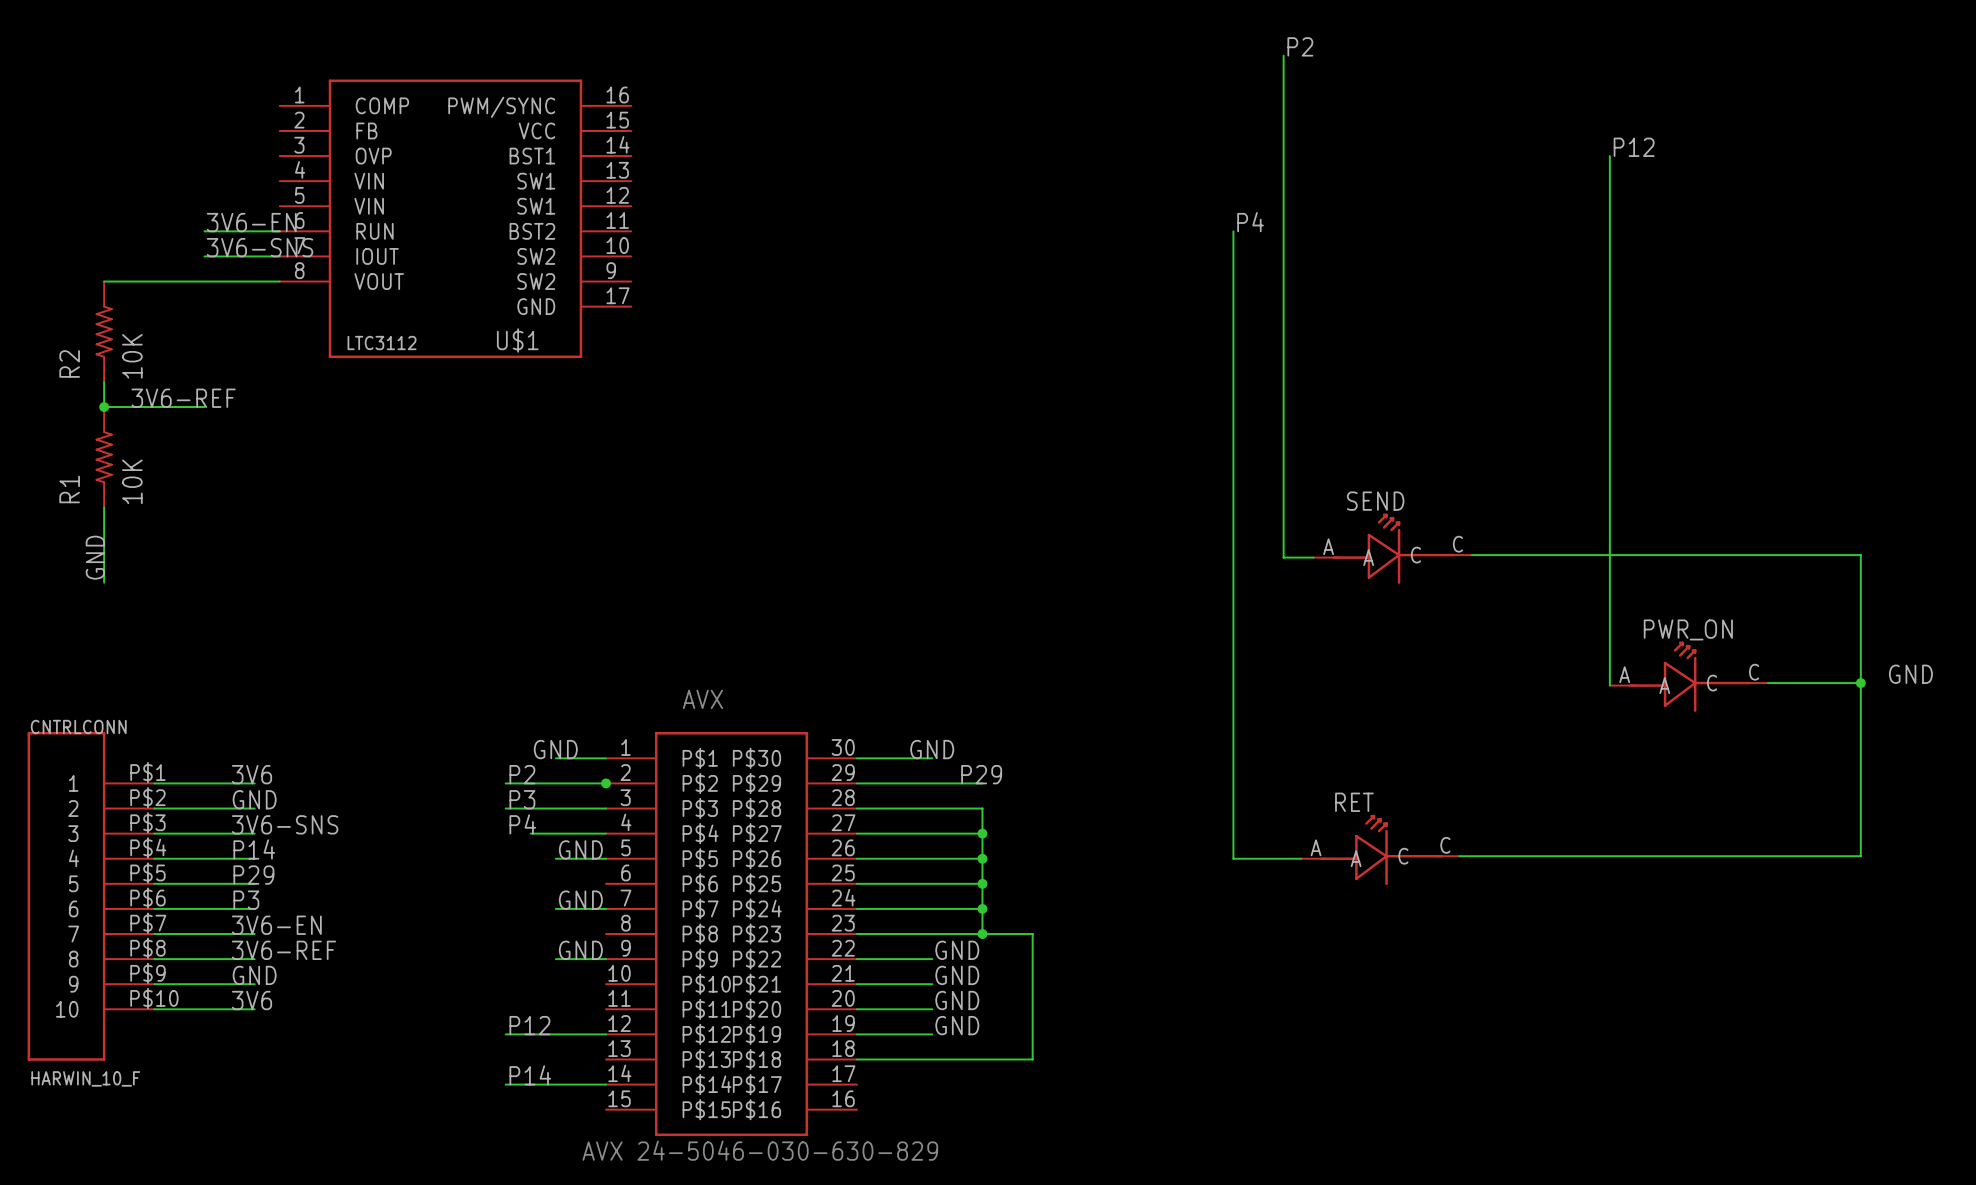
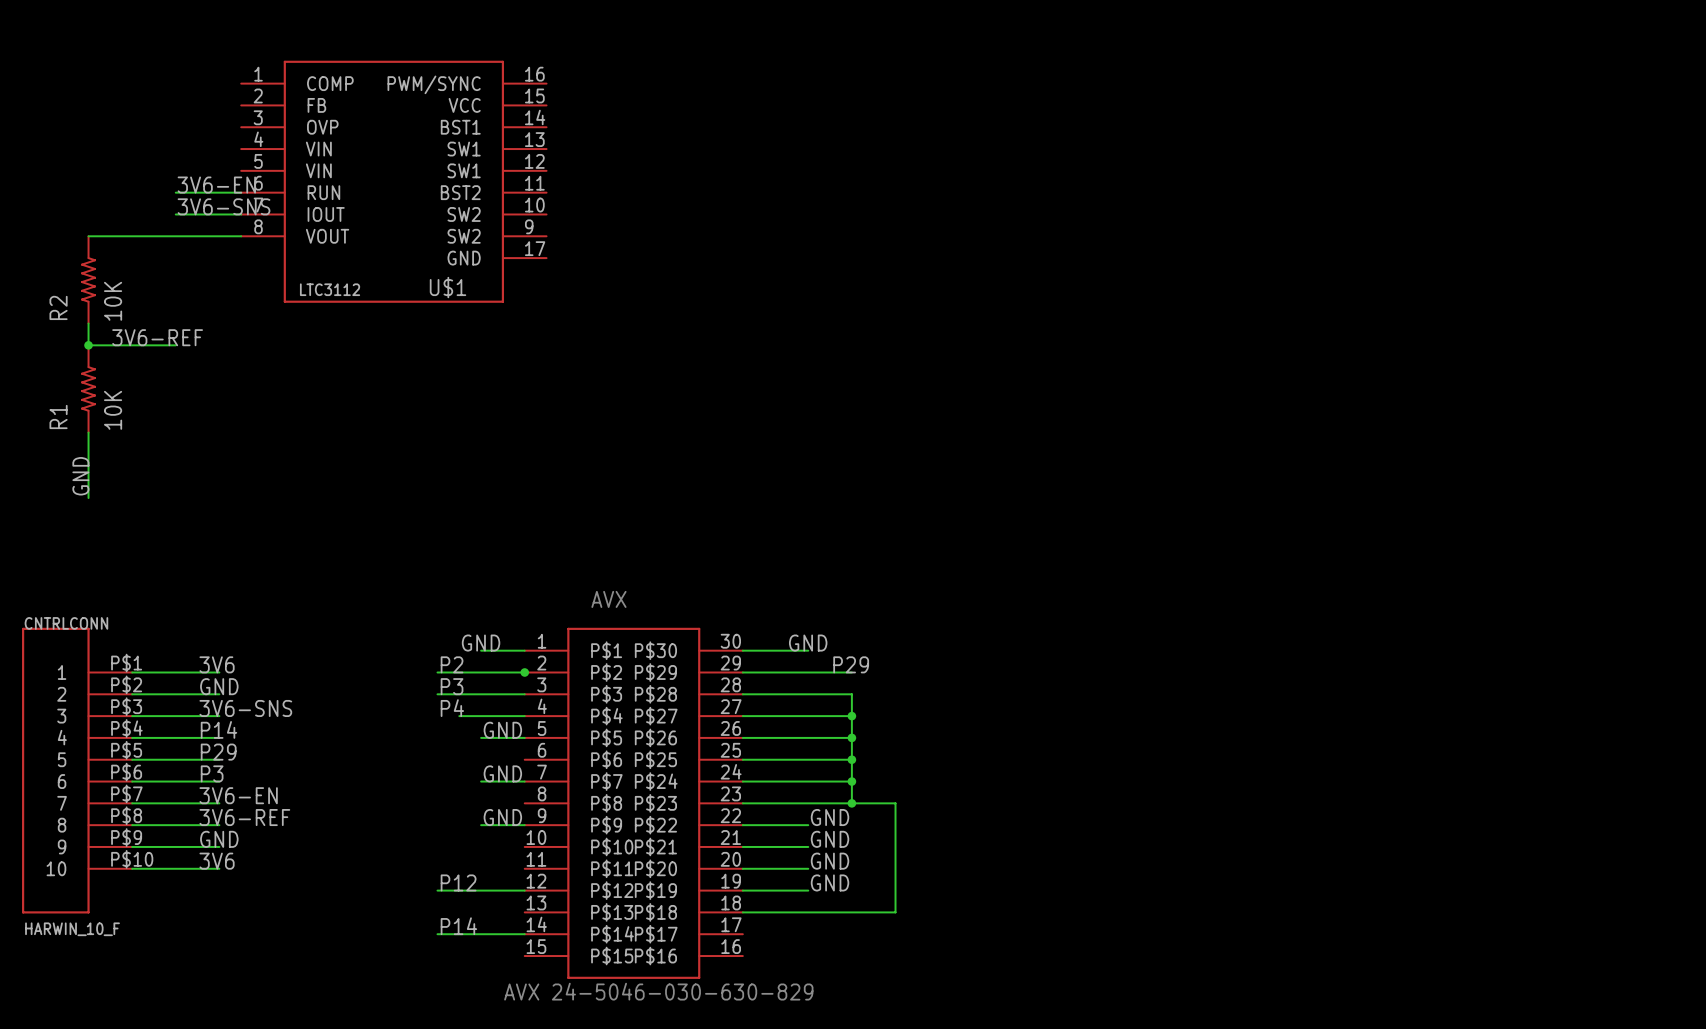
label: P2 (1300, 46) -> none
wire: (1283, 55) (1283, 557) (1313, 557) -> none
label: P12 (1634, 147) -> none
wire: (1609, 156) (1609, 685) -> none
label: P4 (1250, 222) -> none
wire: (1233, 231) (1233, 858) (1301, 858) -> none
SEND: (1392, 548) -> none
wire: (1471, 555) (1860, 555) (1860, 856) (1459, 856) -> none
label: GND (1910, 674) -> none
PWR_ON: (1688, 676) -> none
wire: (1767, 683) (1860, 683) -> none
junction: (1860, 683) -> none
RET: (1380, 849) -> none

